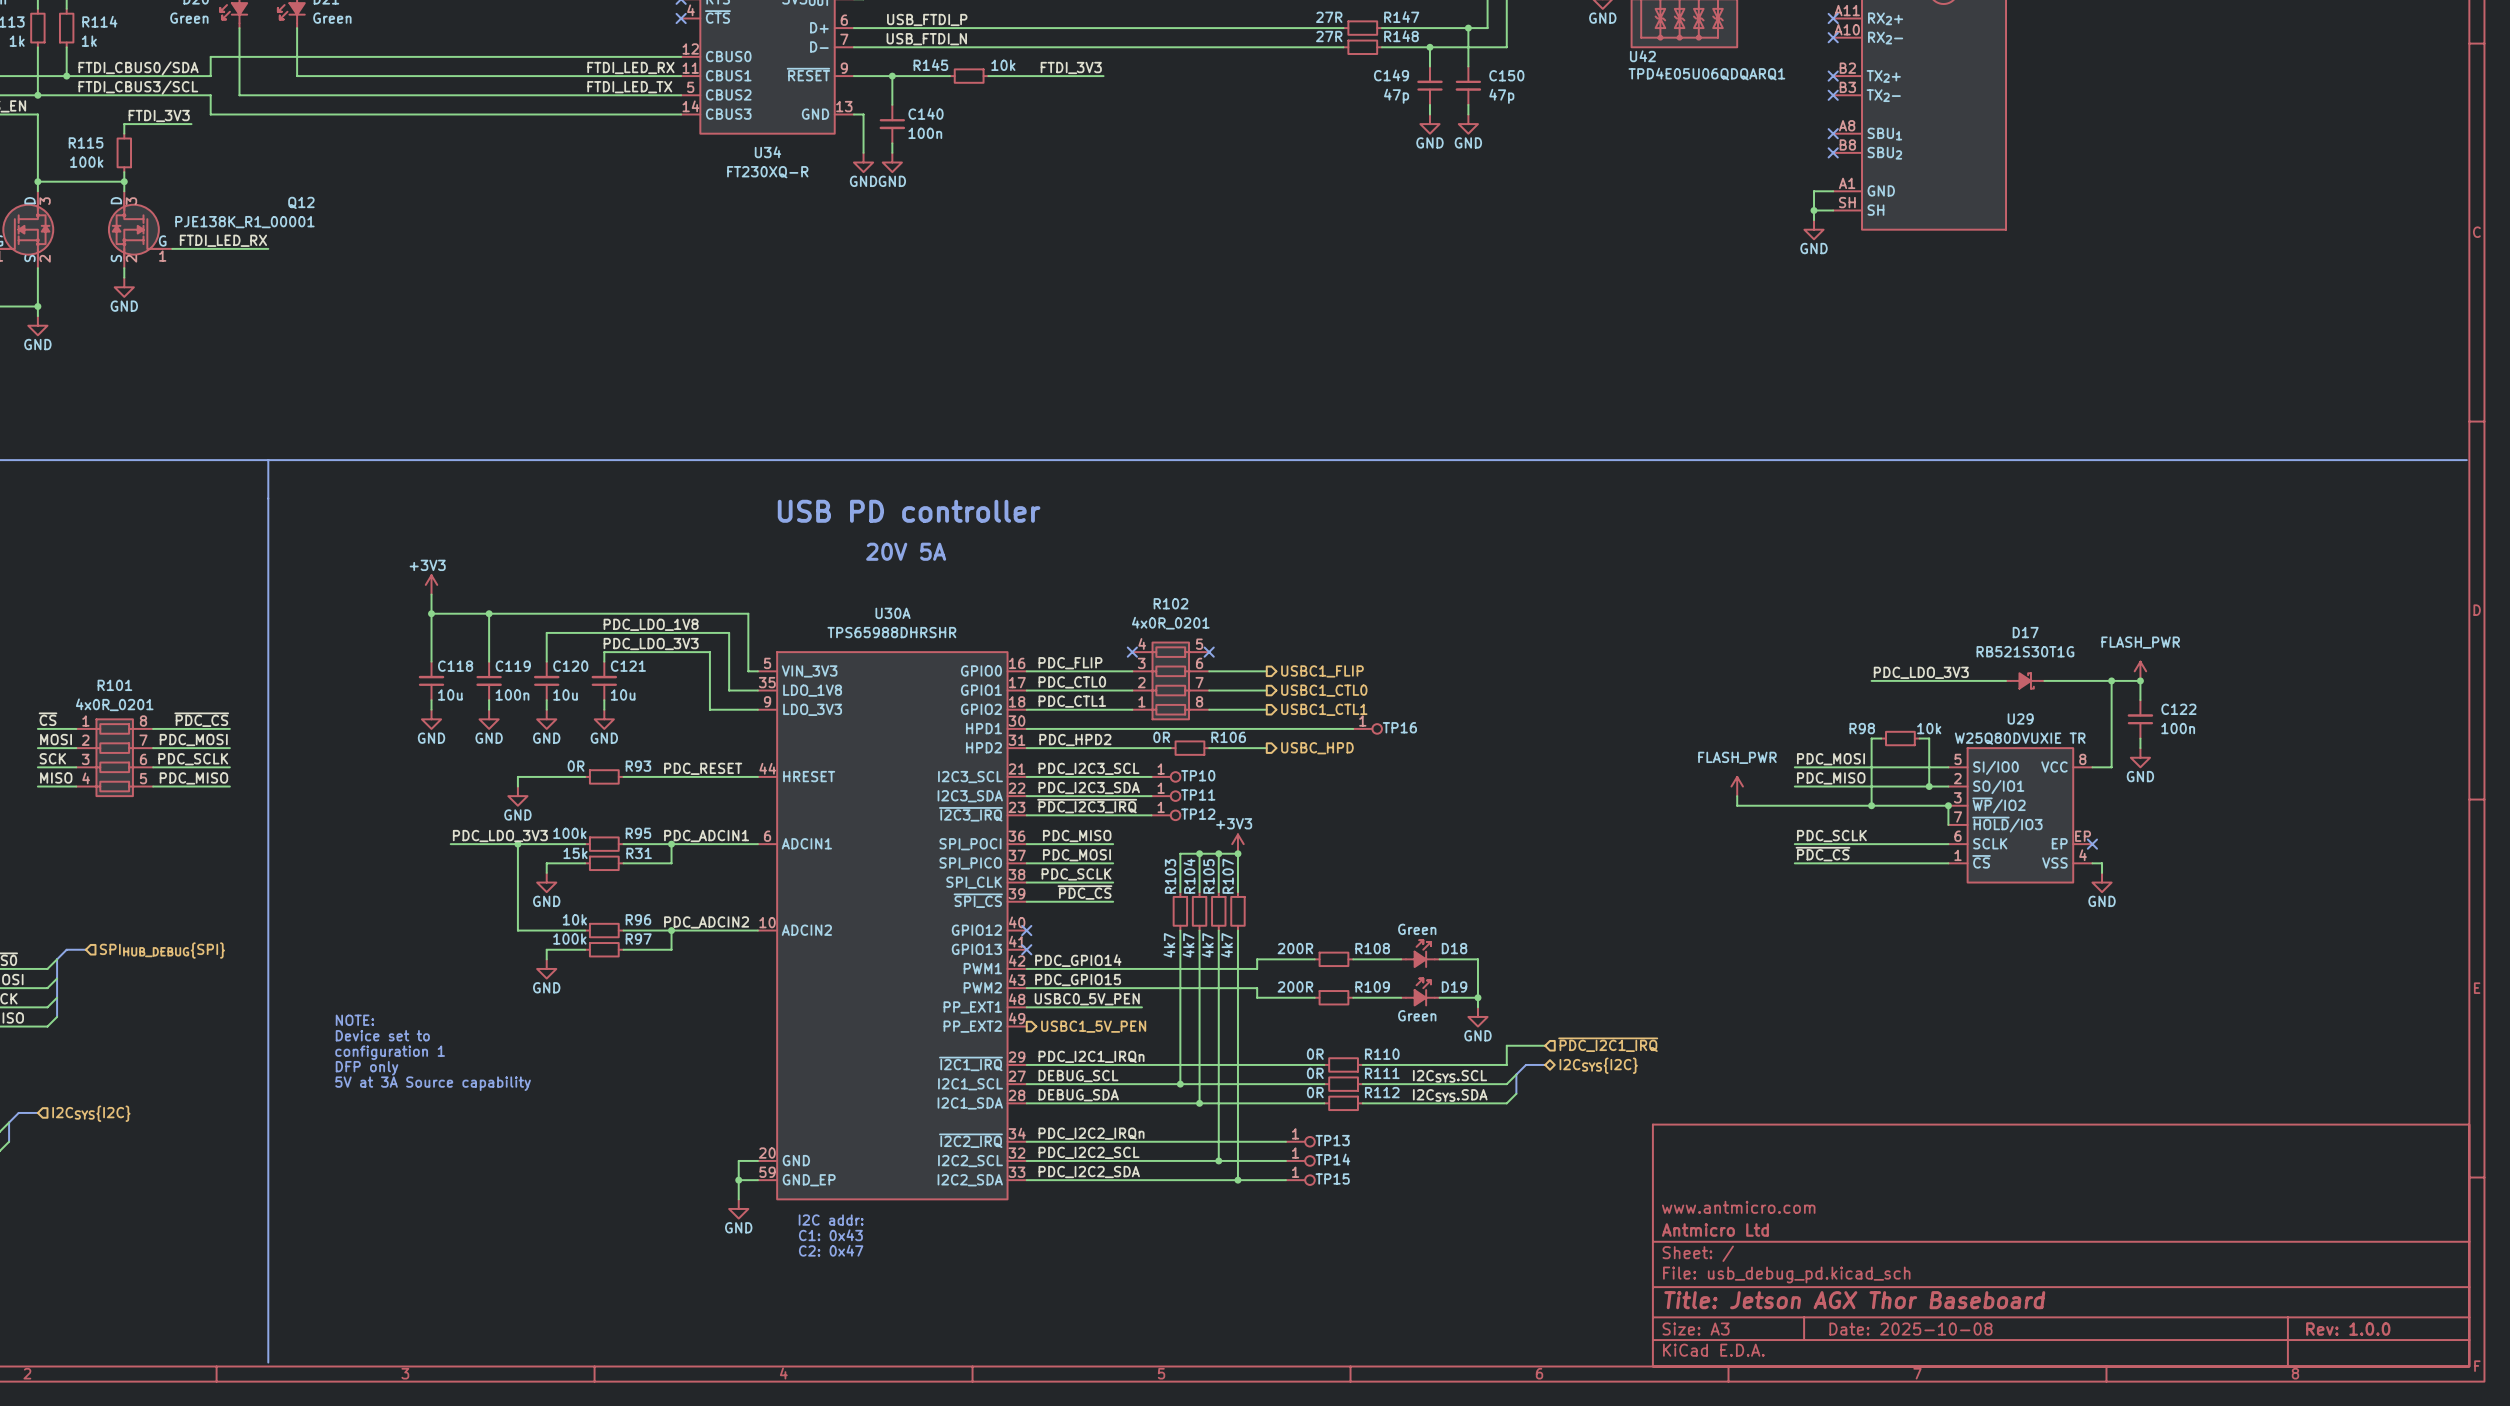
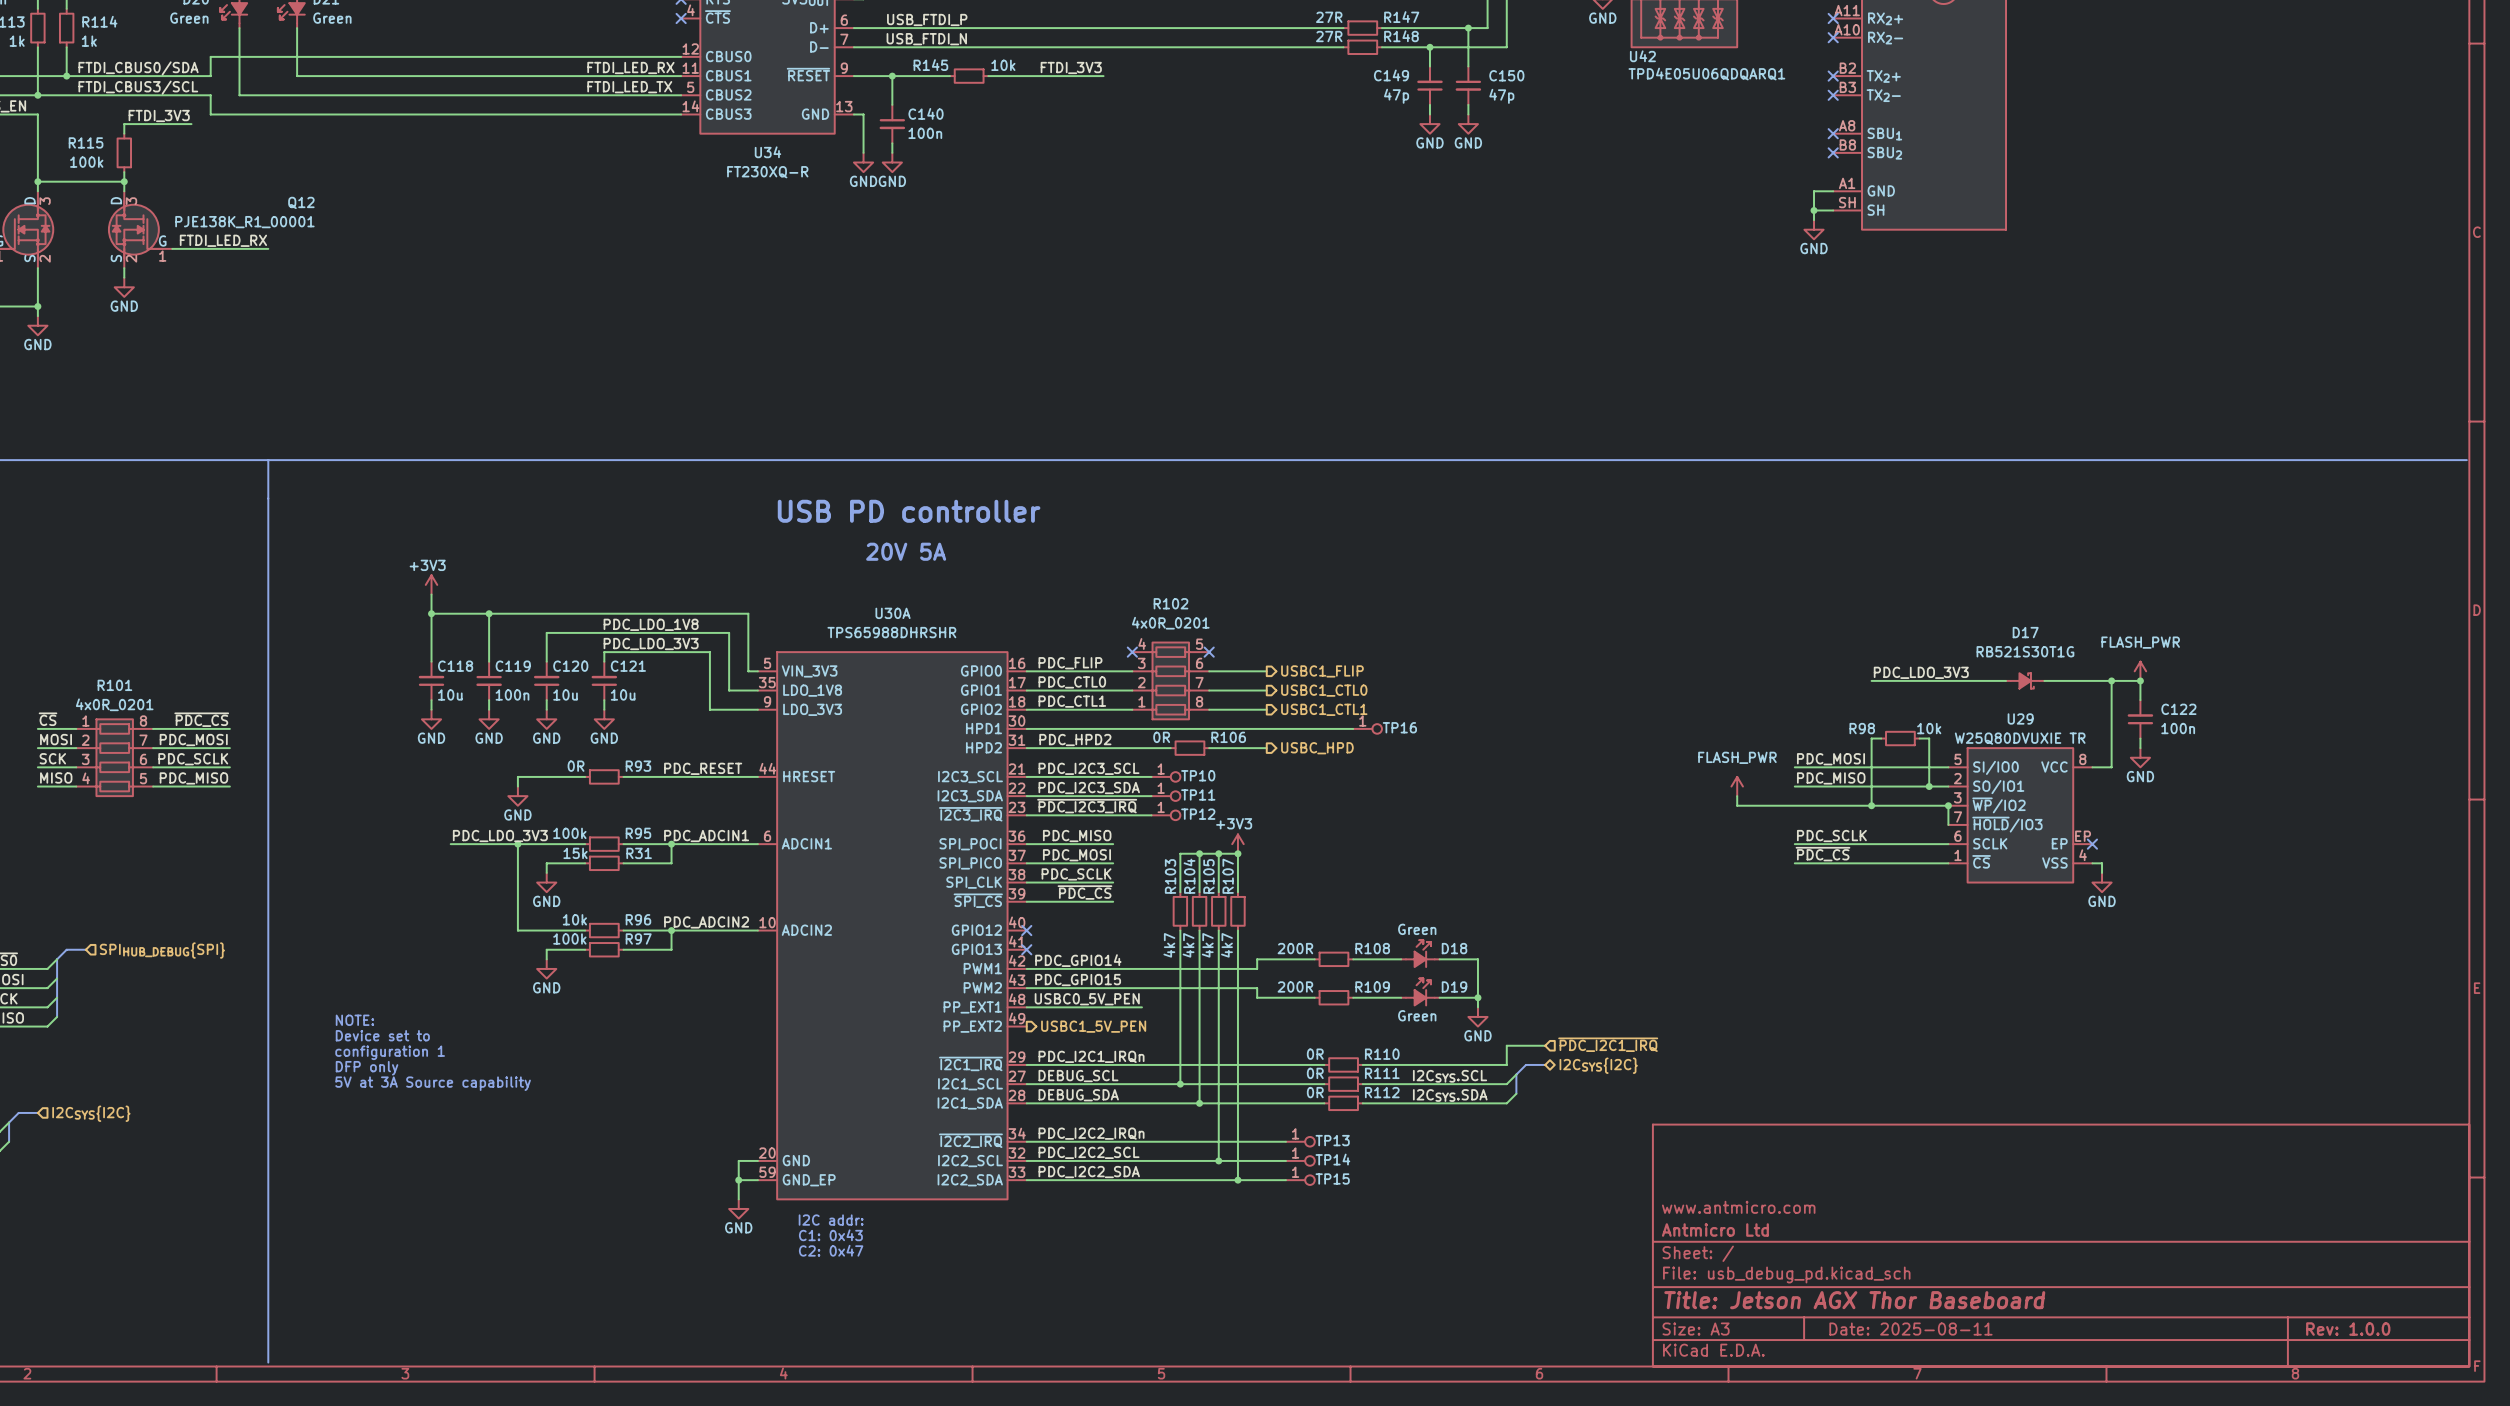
title block: Date: 2025-10-08 (1910, 1329) -> Date: 2025-08-11 (1910, 1329)

